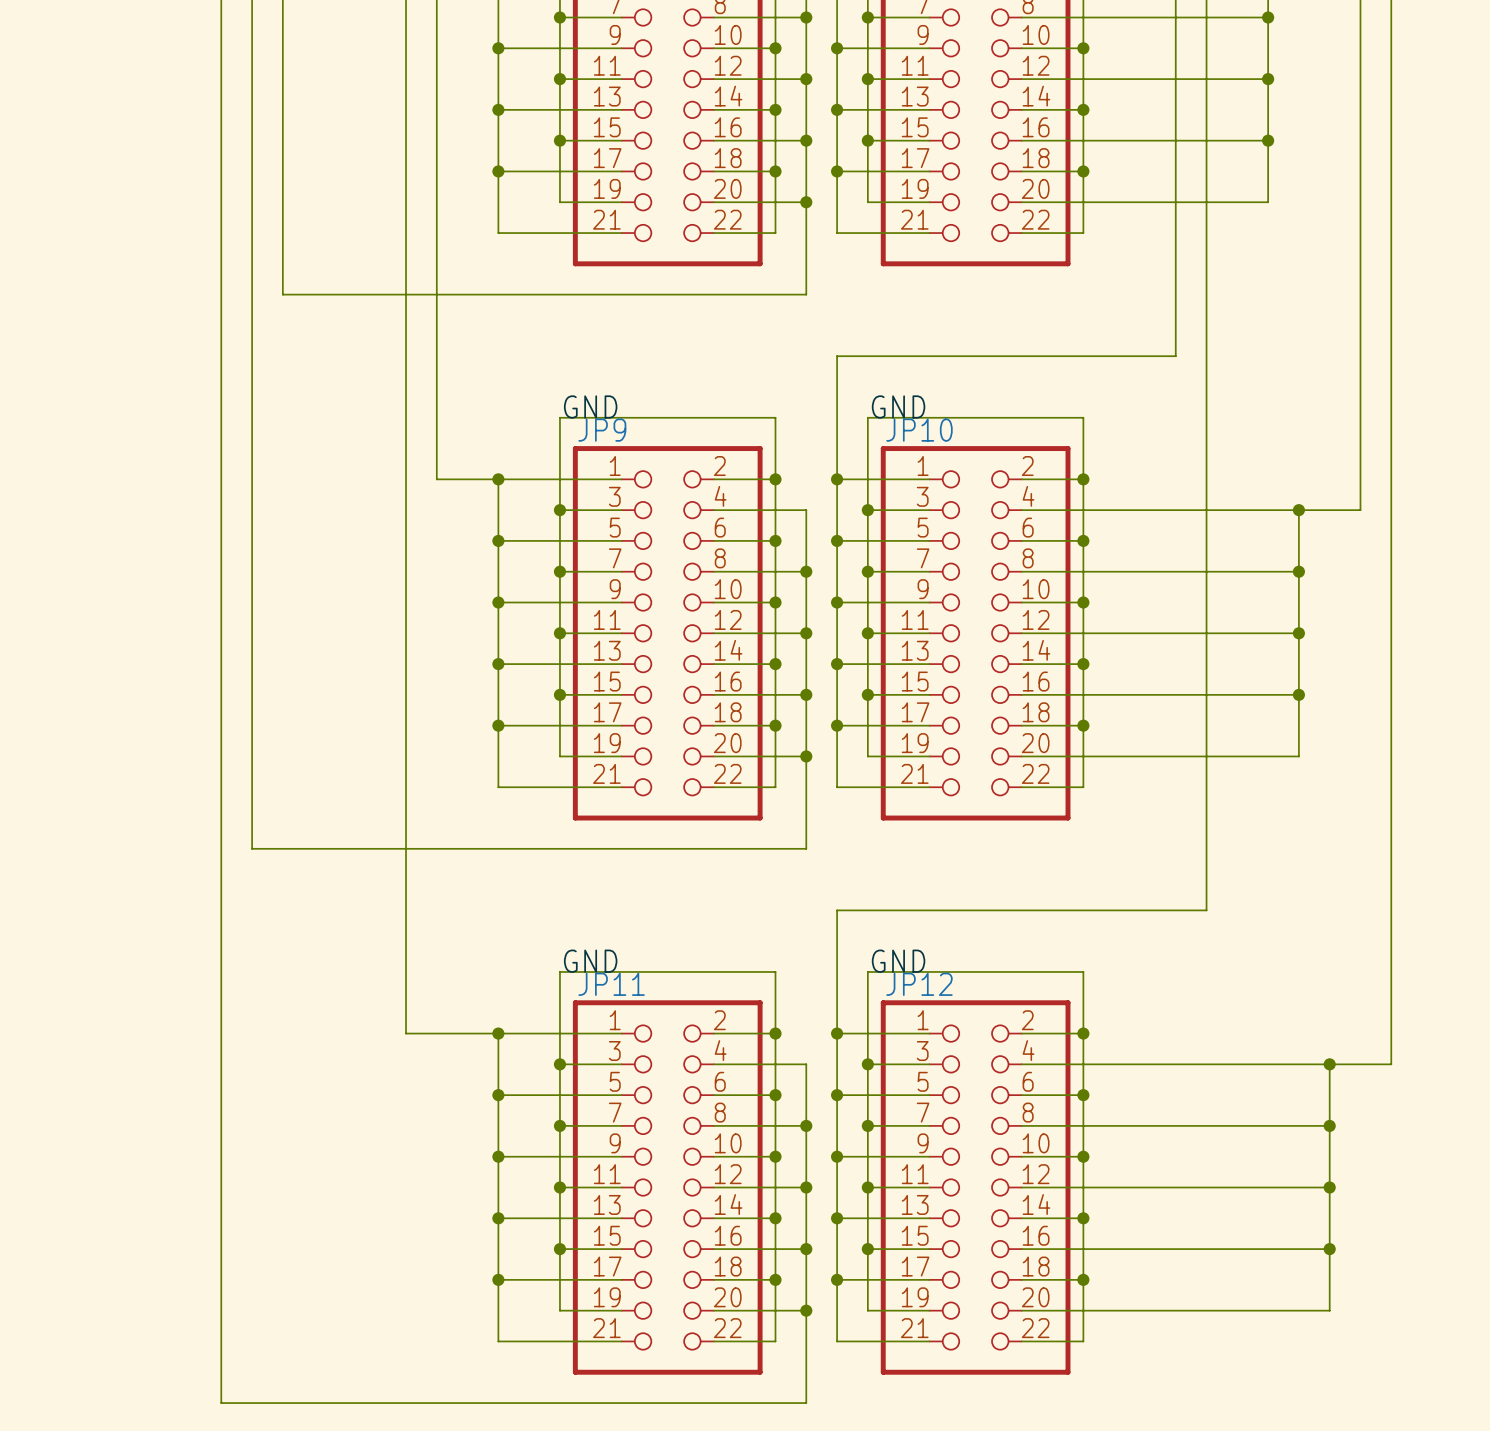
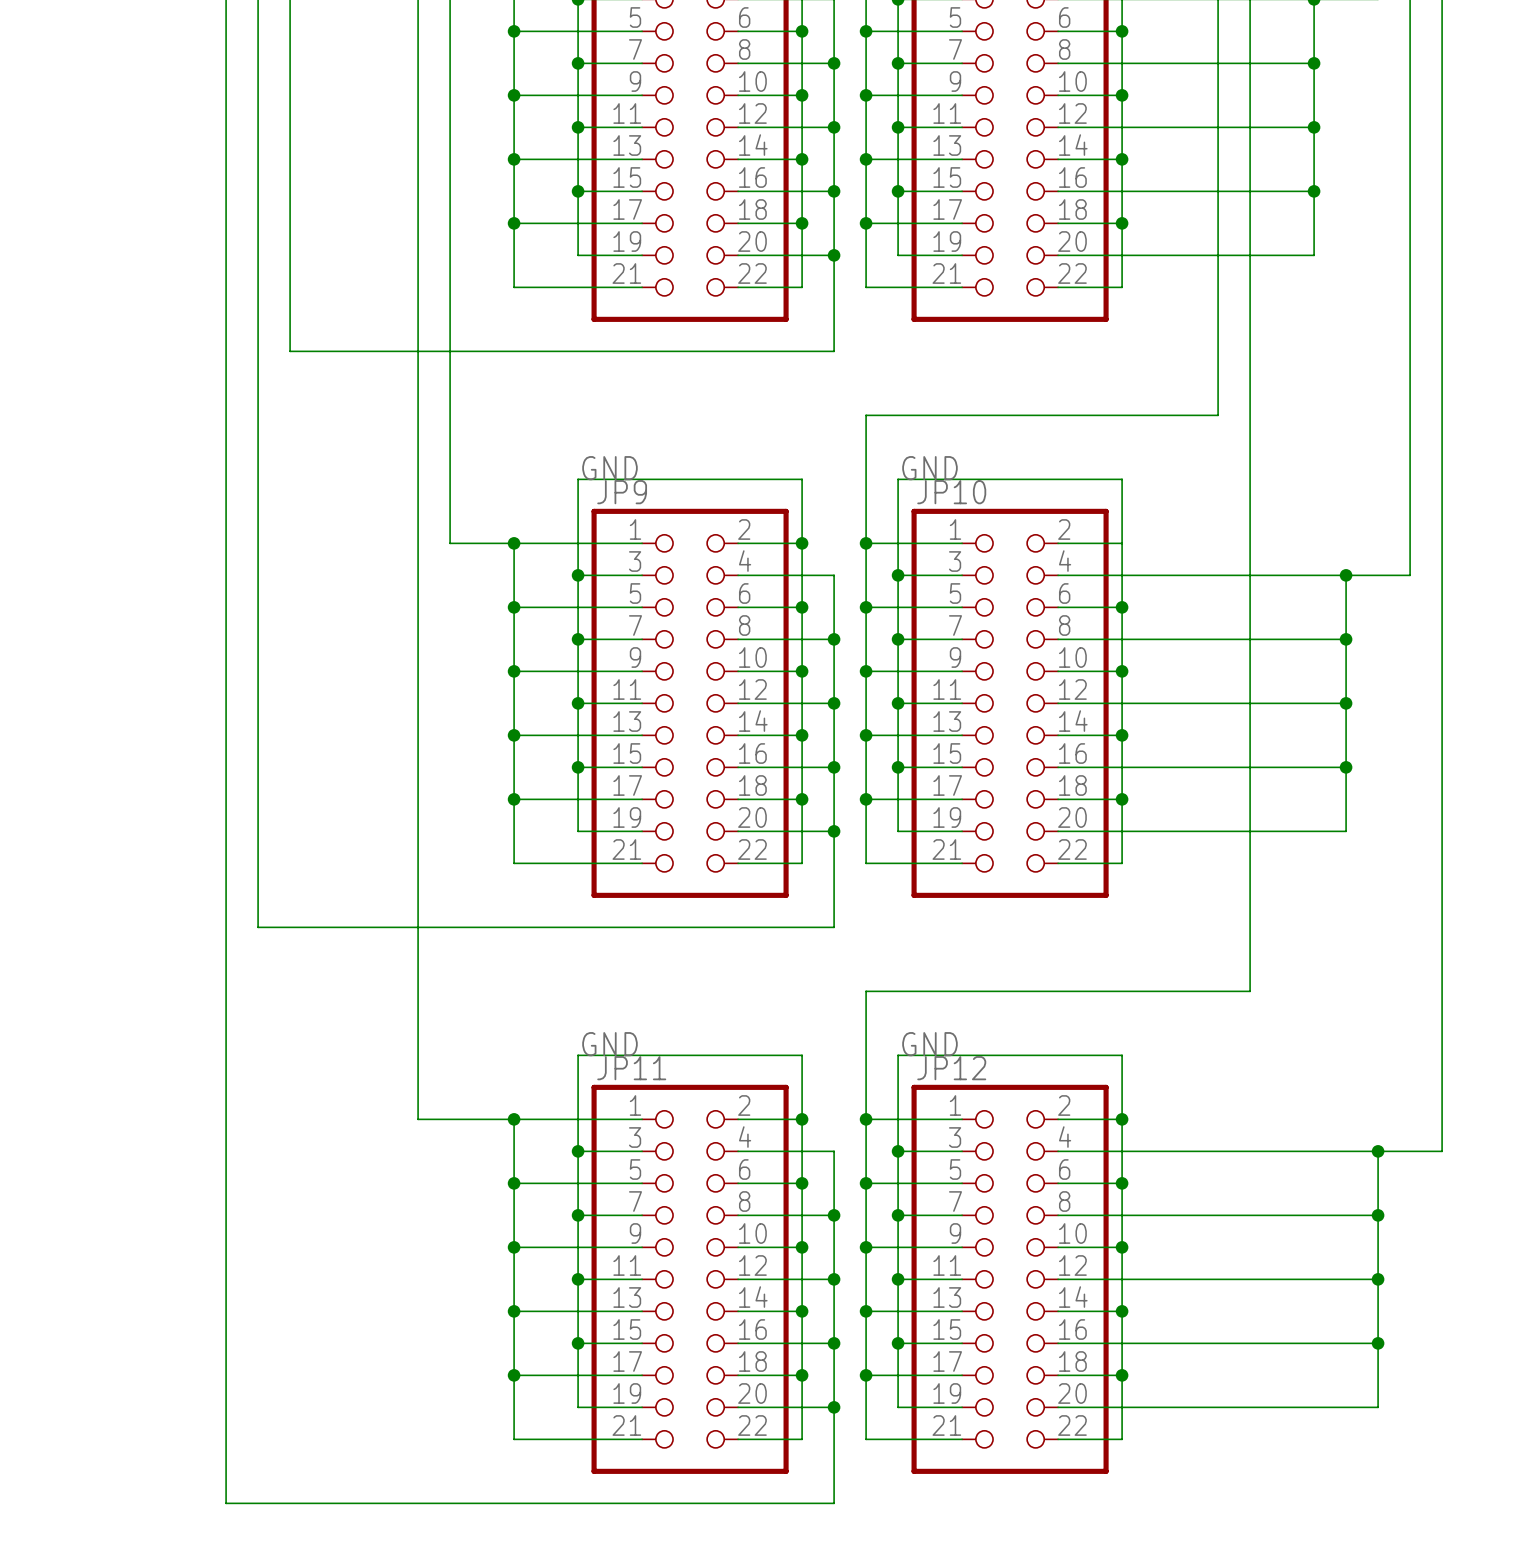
junction: (1083, 479) -> none

